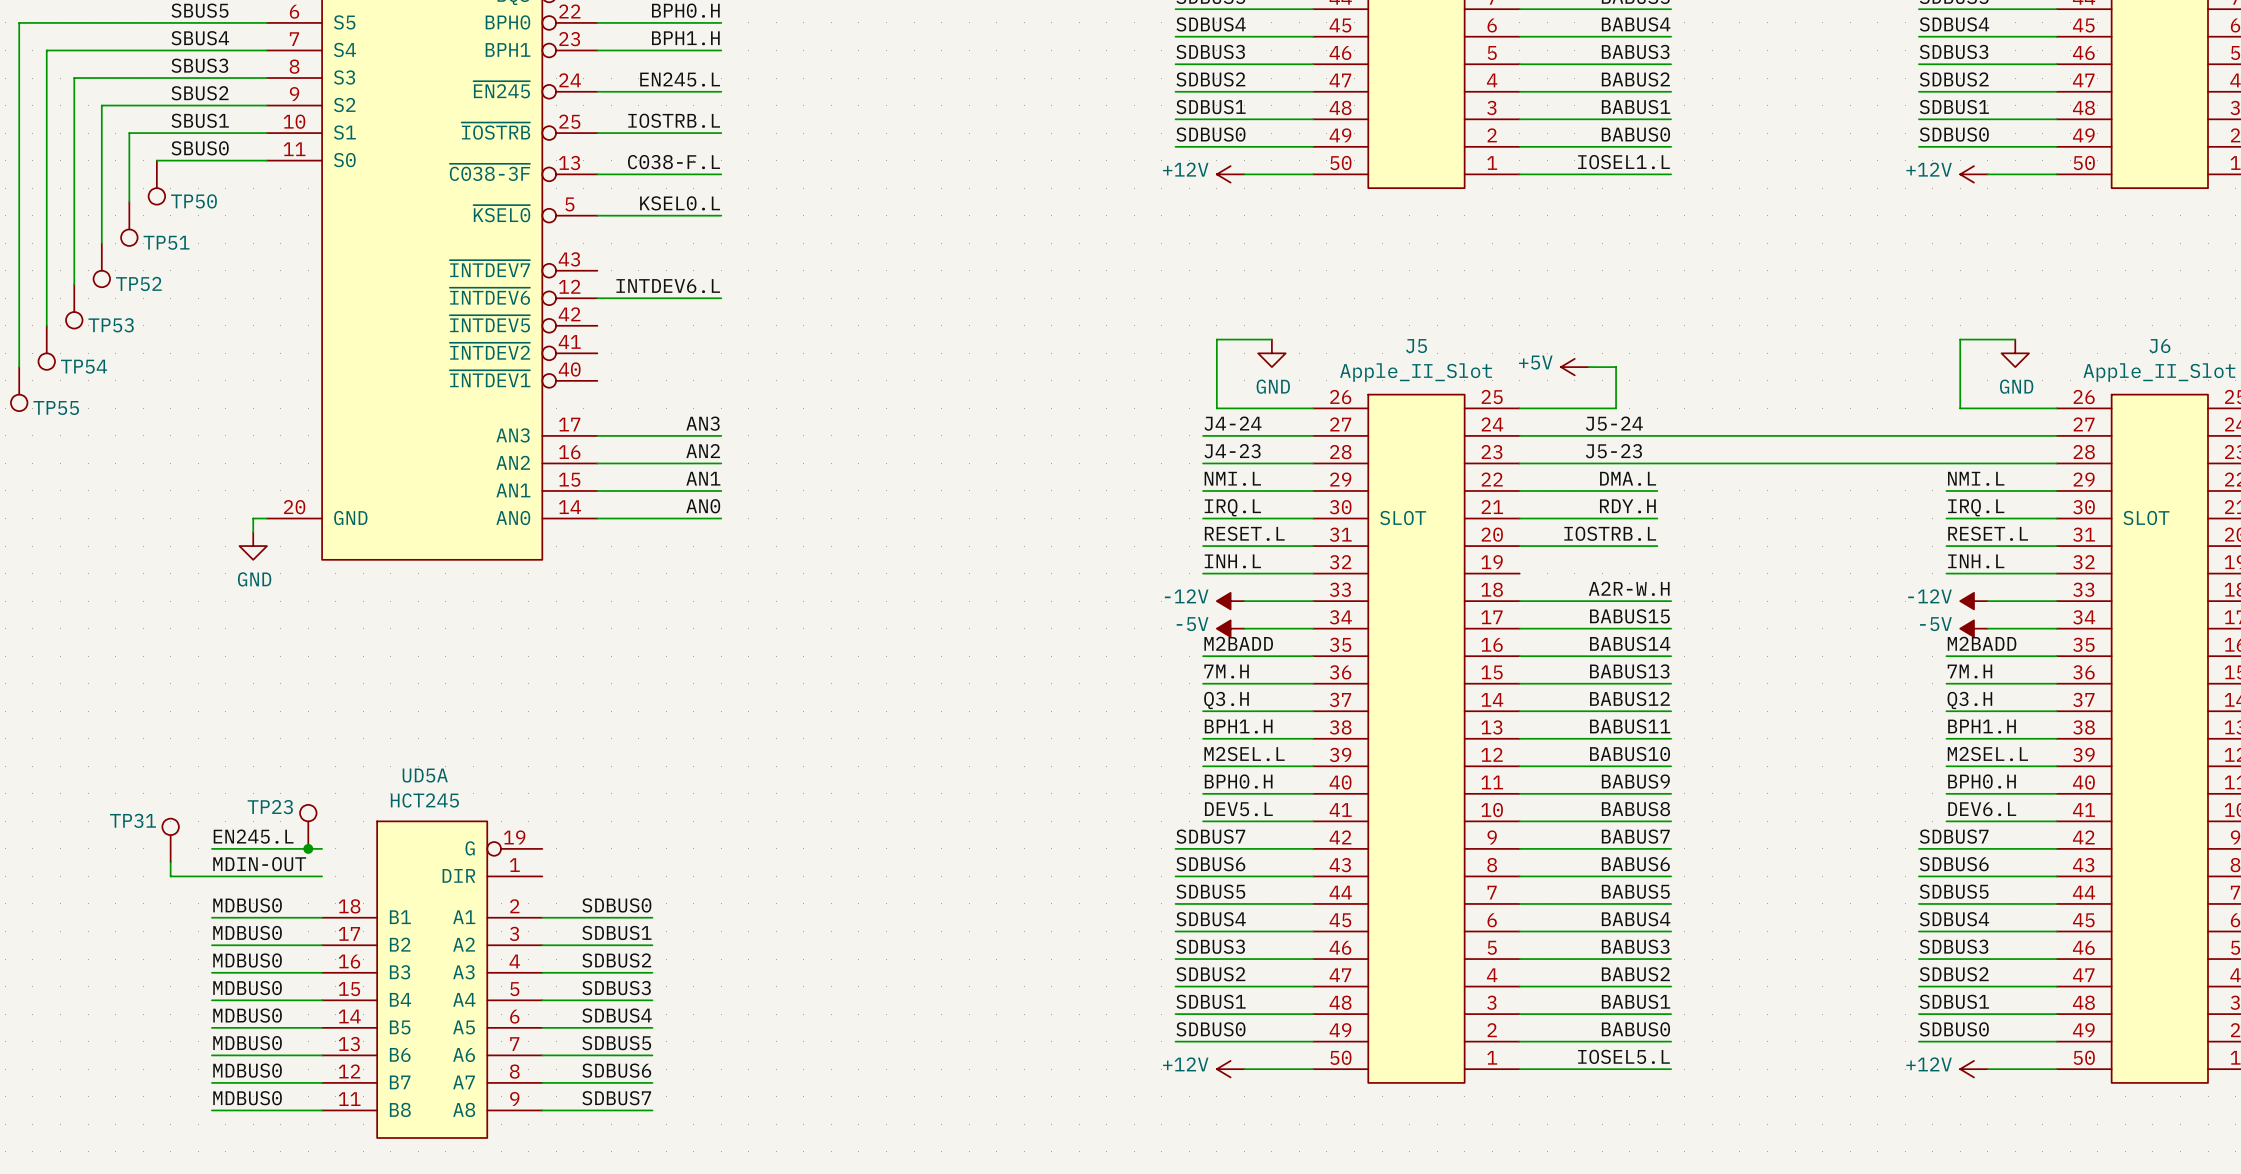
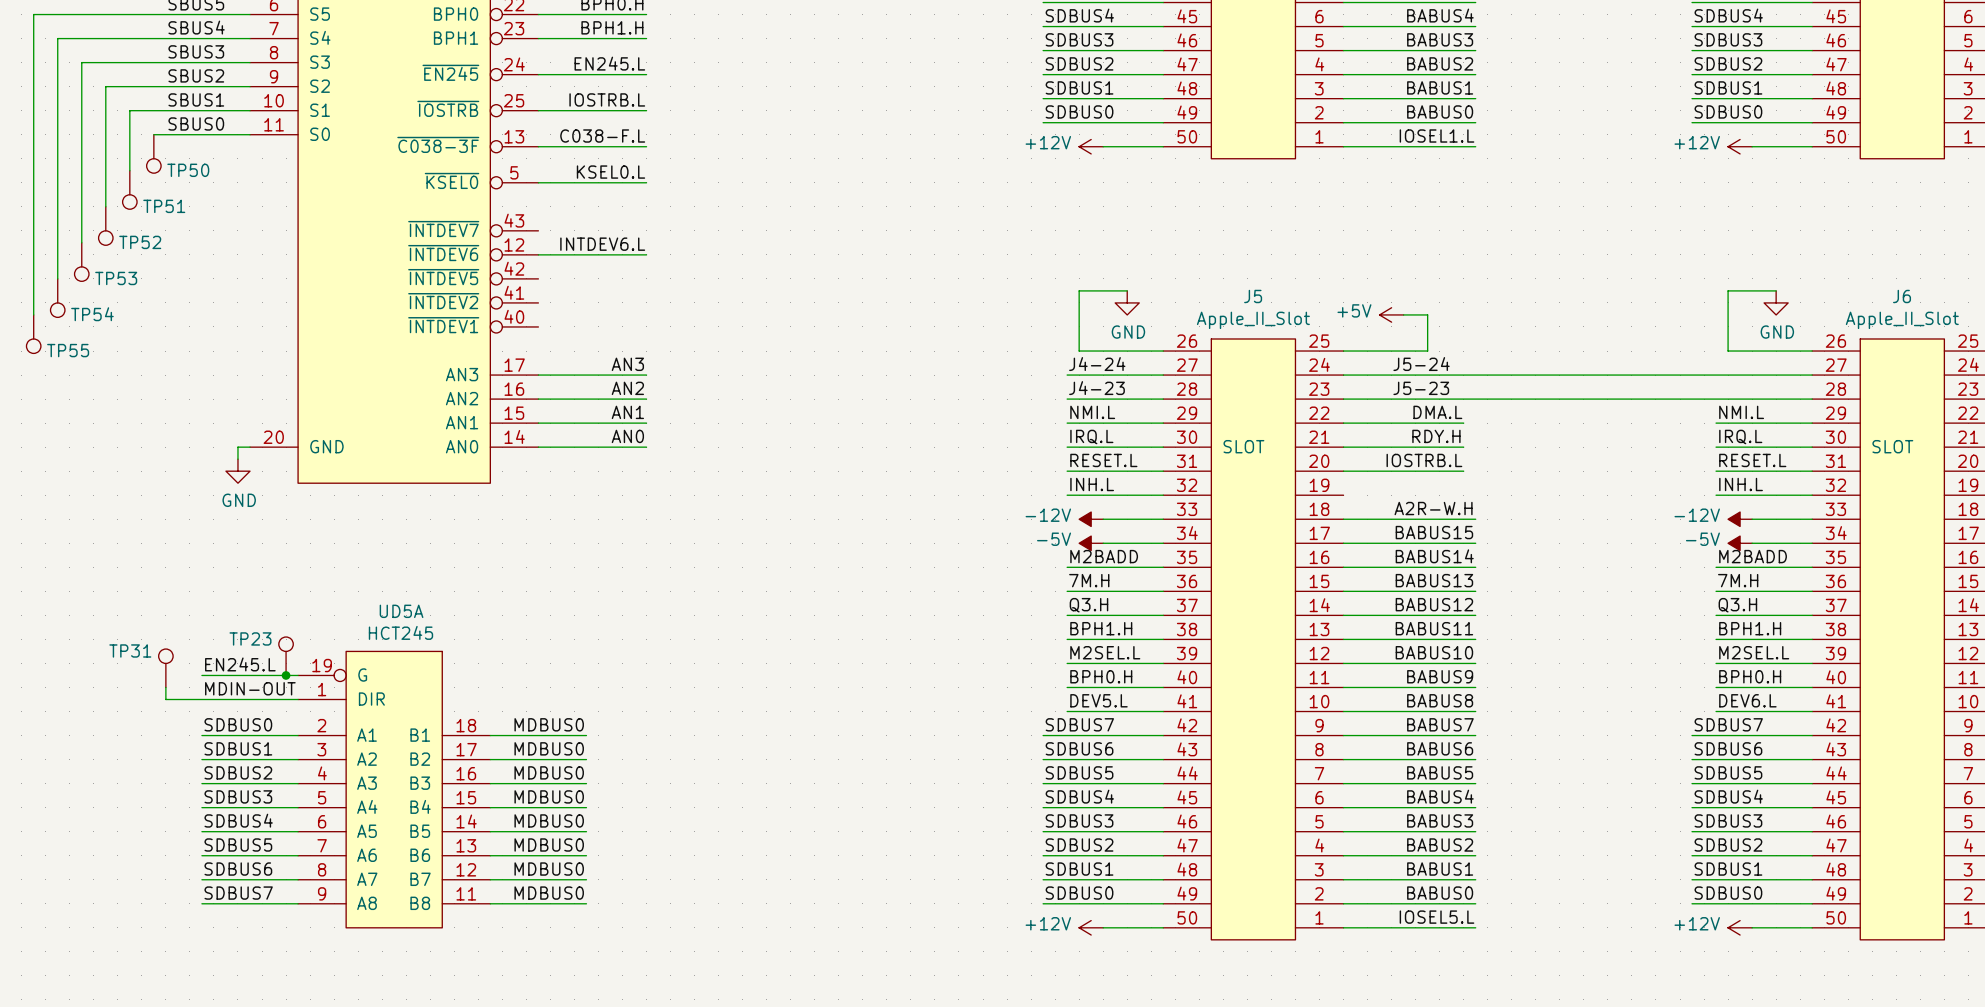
label: none -> EN245.L (240, 664)
junction: none -> (286, 675)
wire: none -> (165, 687) (165, 699) (298, 699)
label: none -> MDIN-OUT (250, 688)
TP23 position: (308, 826) -> (286, 656)
label: EN245.L (253, 836) -> SDBUS0 (238, 724)
label: none -> MDBUS0 (549, 724)
TP31 position: (170, 840) -> (165, 668)
junction: (308, 848) -> none
wire: (170, 862) (170, 876) (211, 876) -> none
label: MDIN-OUT (259, 864) -> SDBUS1 (238, 748)
label: none -> MDBUS0 (549, 748)
label: none -> SDBUS2 (238, 772)
label: none -> MDBUS0 (549, 772)
label: MDBUS0 (247, 905) -> none
label: SDBUS0 (616, 905) -> none
wire: (211, 917) (322, 917) -> (201, 675) (298, 675)
wire: (542, 917) (652, 917) -> (490, 735) (586, 735)
label: none -> SDBUS3 (238, 796)
label: none -> MDBUS0 (549, 796)
label: MDBUS0 (247, 932) -> none
label: SDBUS1 (616, 932) -> none
wire: (211, 945) (322, 945) -> none
wire: (542, 945) (652, 945) -> (490, 759) (586, 759)
label: none -> SDBUS4 (238, 820)
label: none -> MDBUS0 (549, 820)
label: MDBUS0 (247, 960) -> none
label: SDBUS2 (616, 960) -> none
wire: (211, 972) (322, 972) -> (201, 783) (298, 783)
wire: (542, 972) (652, 972) -> (490, 783) (586, 783)
label: none -> SDBUS5 (238, 844)
label: none -> MDBUS0 (549, 844)
UD5A flip: as is (432, 979) -> left-right (394, 789)
label: MDBUS0 (247, 988) -> none
label: SDBUS3 (616, 988) -> none
wire: (211, 1000) (322, 1000) -> (201, 807) (298, 807)
wire: (542, 1000) (652, 1000) -> (490, 807) (586, 807)
label: none -> SDBUS6 (238, 869)
label: none -> MDBUS0 (549, 869)
label: MDBUS0 (247, 1015) -> none
label: SDBUS4 (617, 1015) -> none
wire: (211, 1027) (322, 1027) -> (201, 831) (298, 831)
wire: (542, 1027) (652, 1027) -> (490, 831) (586, 831)
label: none -> SDBUS7 (238, 893)
label: none -> MDBUS0 (549, 893)
label: MDBUS0 (247, 1043) -> none
label: SDBUS5 (616, 1043) -> none
wire: (211, 1055) (322, 1055) -> (201, 855) (298, 855)
wire: (542, 1055) (652, 1055) -> (490, 855) (586, 855)
label: MDBUS0 (247, 1070) -> none
label: SDBUS6 (616, 1070) -> none
wire: (211, 1082) (322, 1082) -> (201, 879) (298, 879)
wire: (542, 1082) (652, 1082) -> (490, 879) (586, 879)
label: MDBUS0 (247, 1098) -> none
label: SDBUS7 (616, 1098) -> none
wire: (211, 1110) (322, 1110) -> (201, 903) (298, 903)
wire: (542, 1110) (652, 1110) -> (490, 903) (586, 903)

